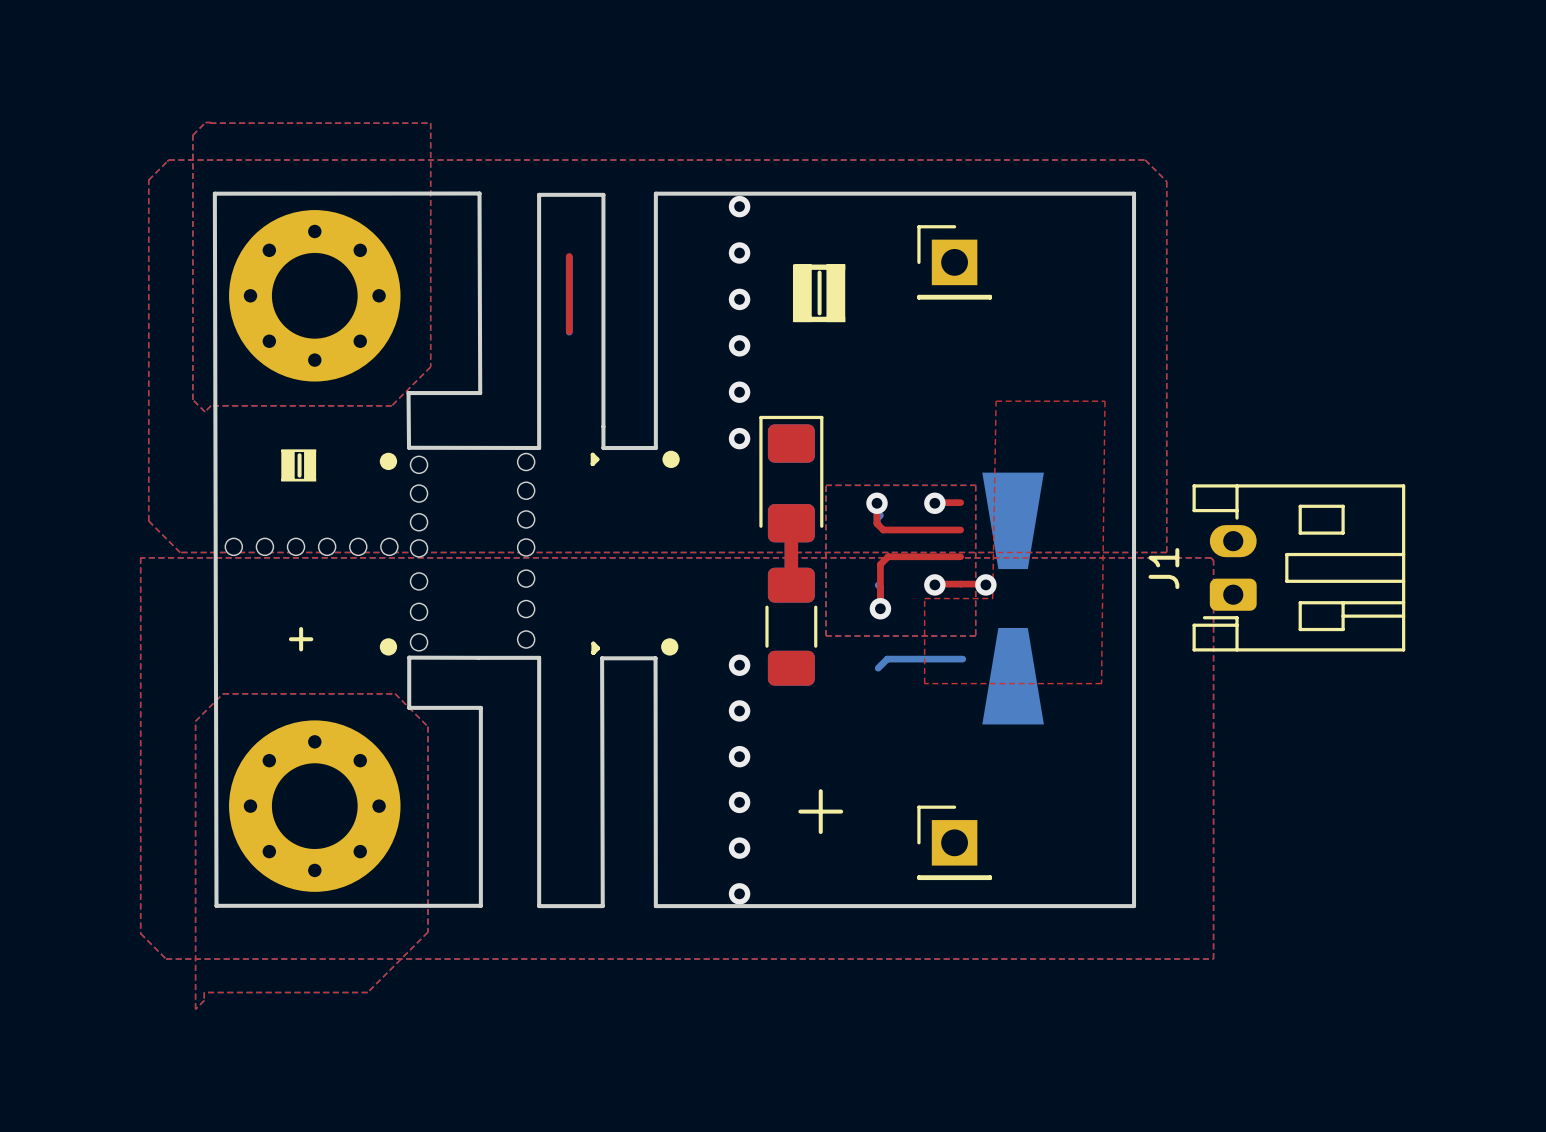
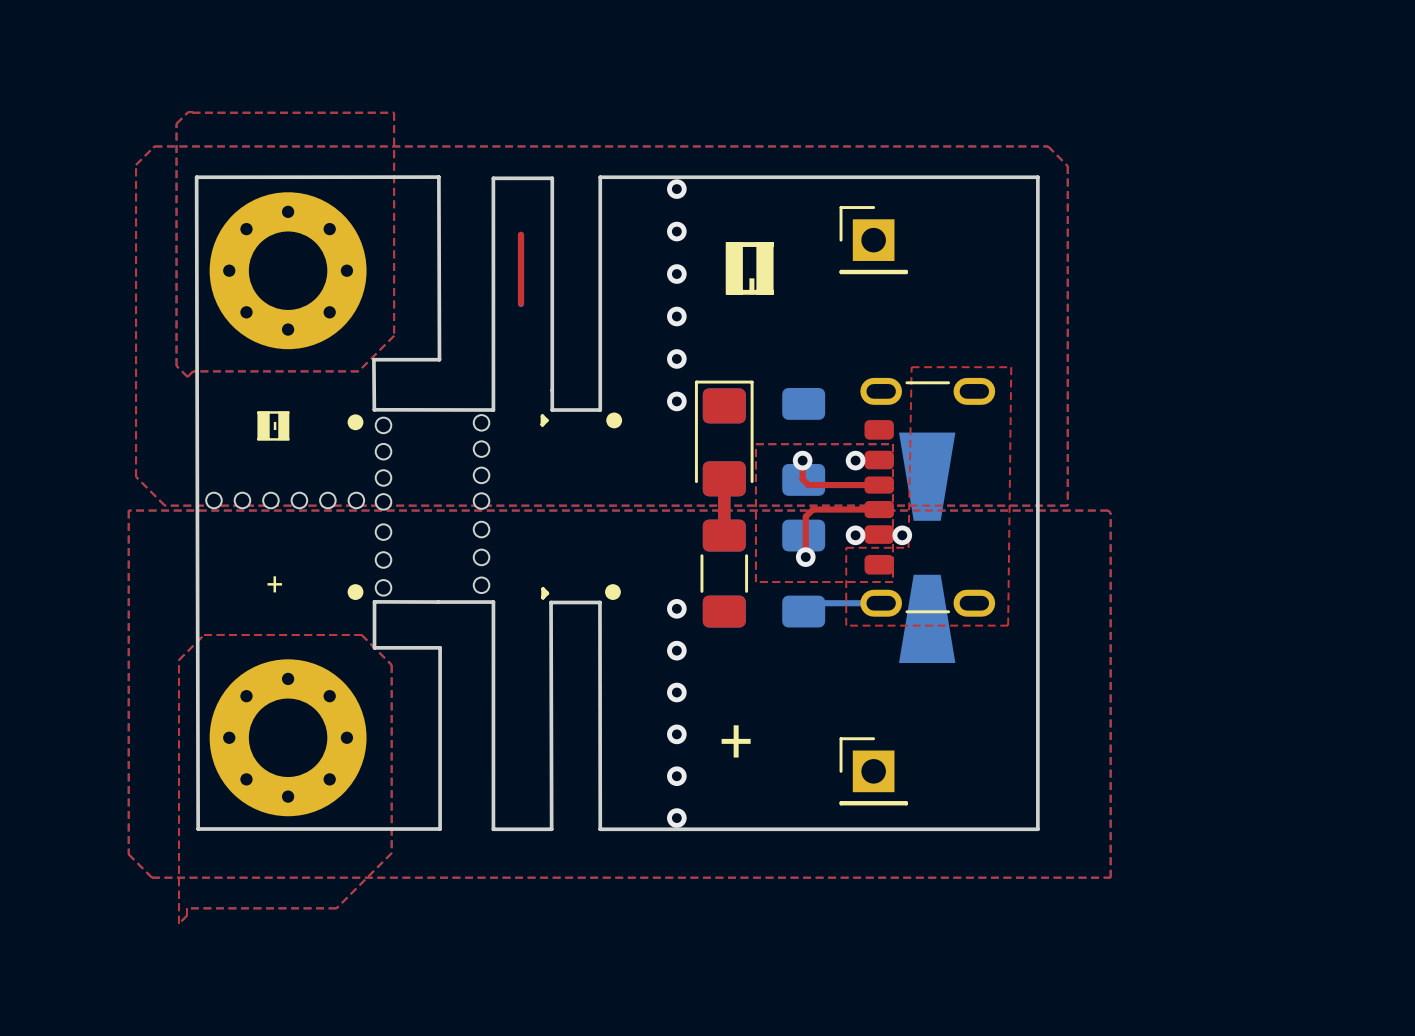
part: none -> (803, 441)
part: none -> (927, 497)
J1: (1298, 567) -> none
part: none -> (803, 573)

